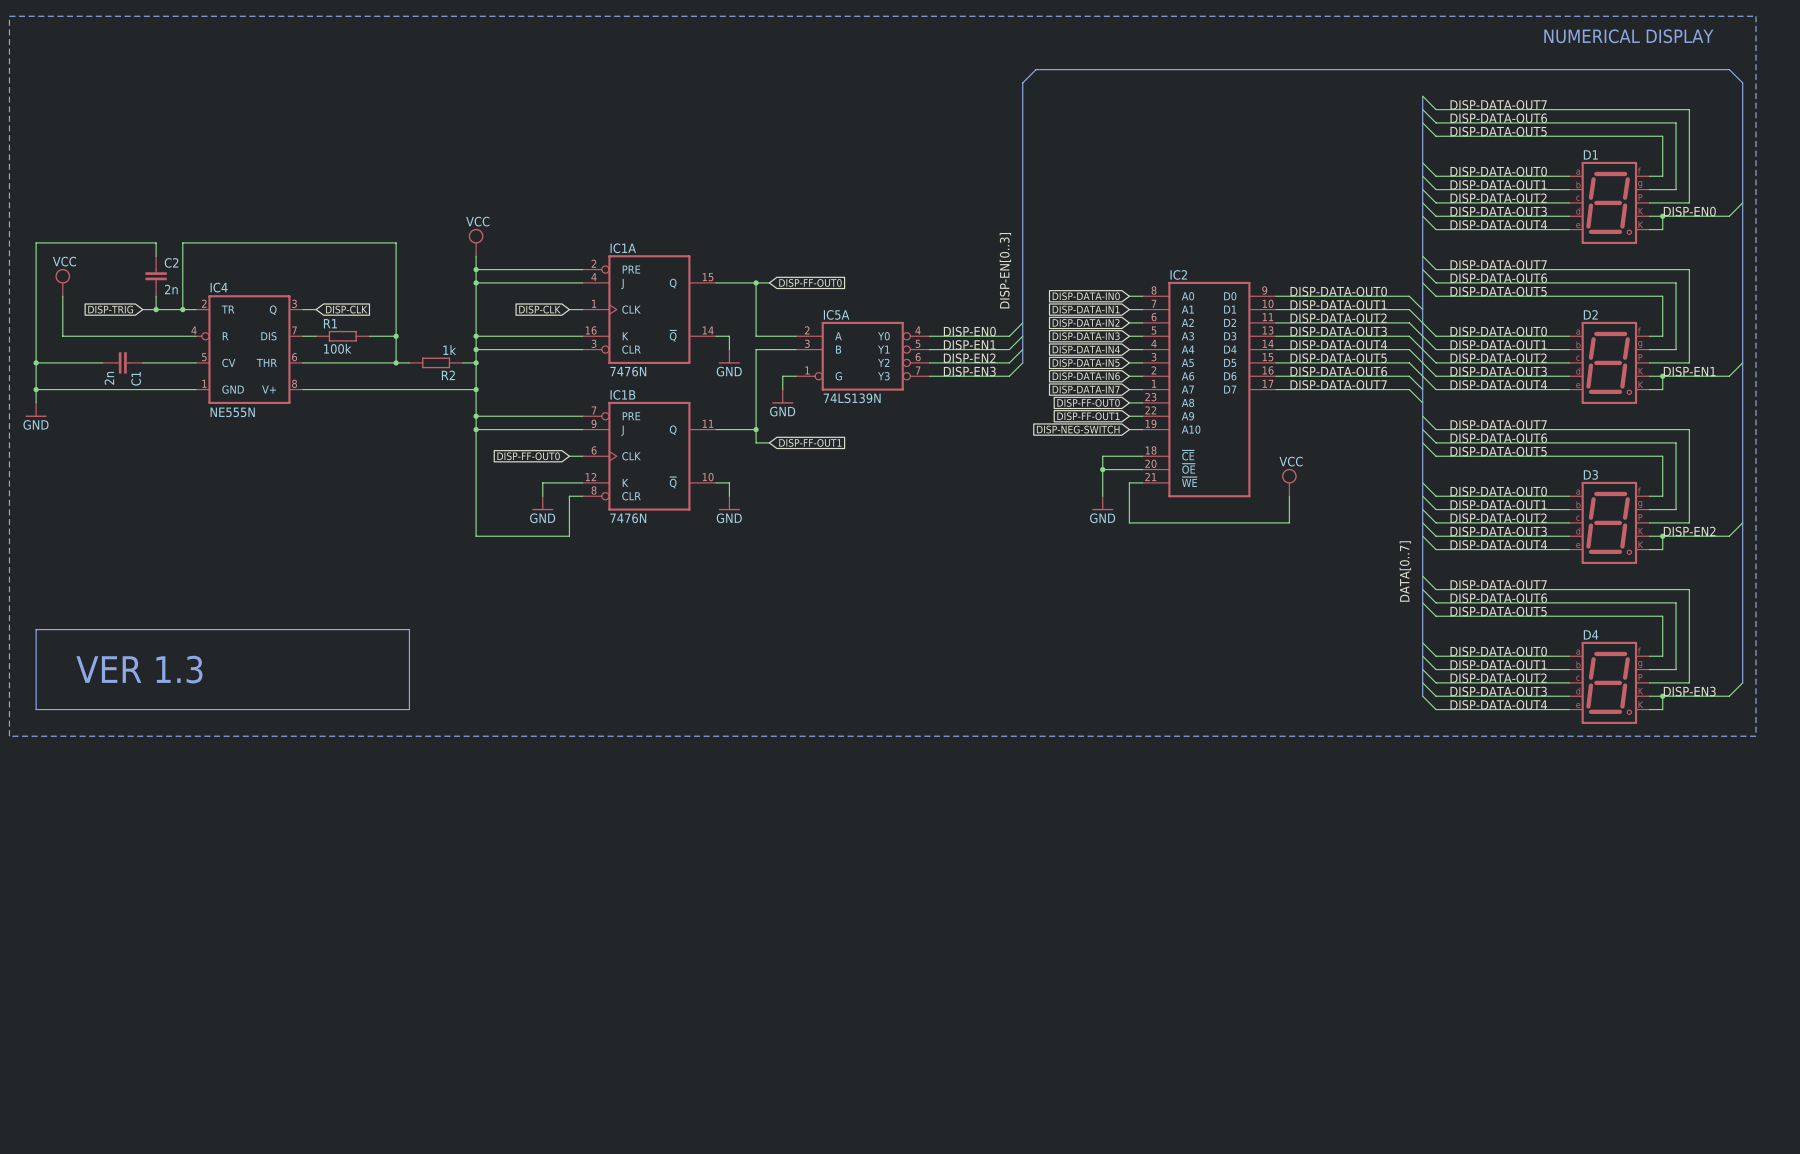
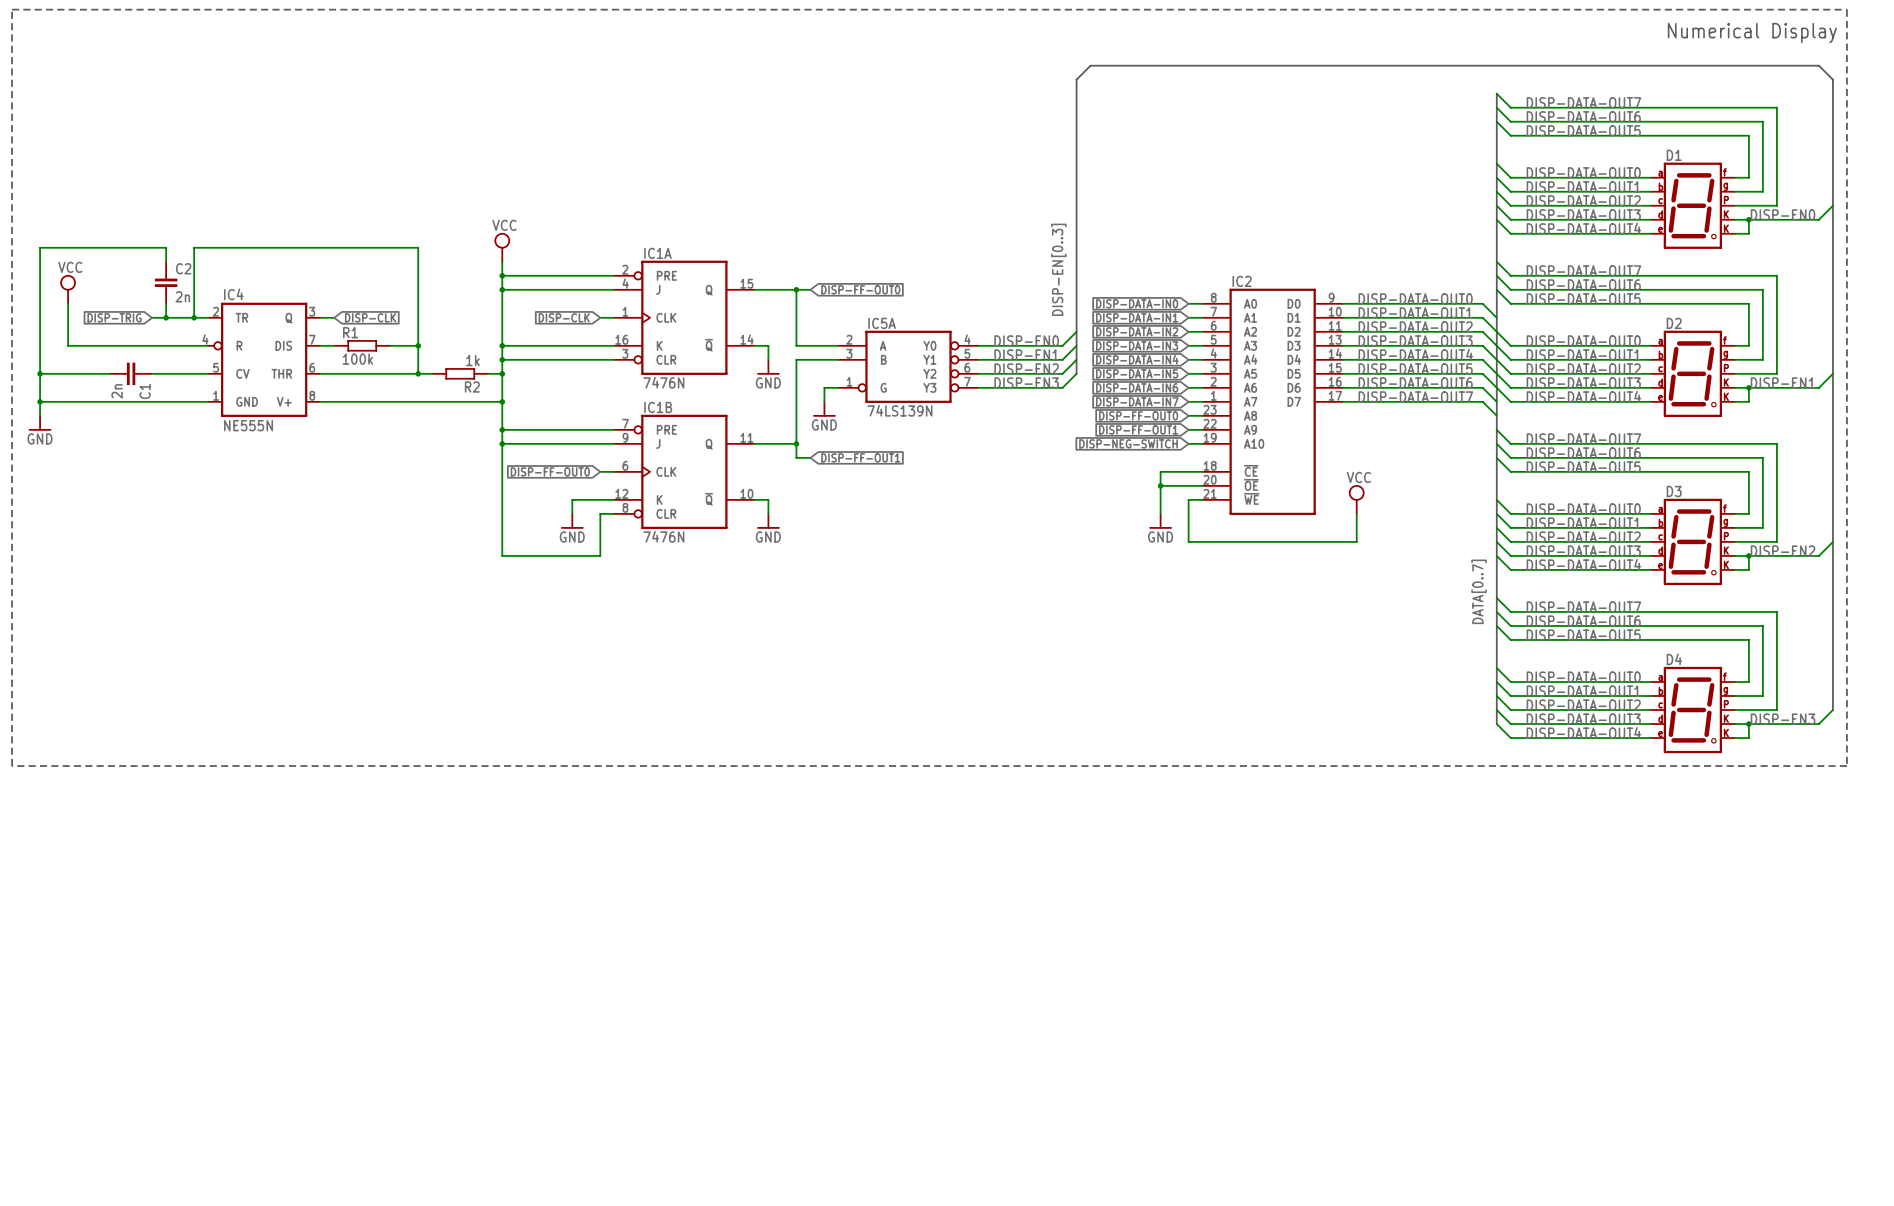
text: NUMERICAL DISPLAY (1628, 36) -> none
text: none -> Numerical Display (1752, 33)
line: (36, 629) (36, 709) (409, 709) (409, 629) (36, 629) -> none
text: VER 1.3 (139, 669) -> none

